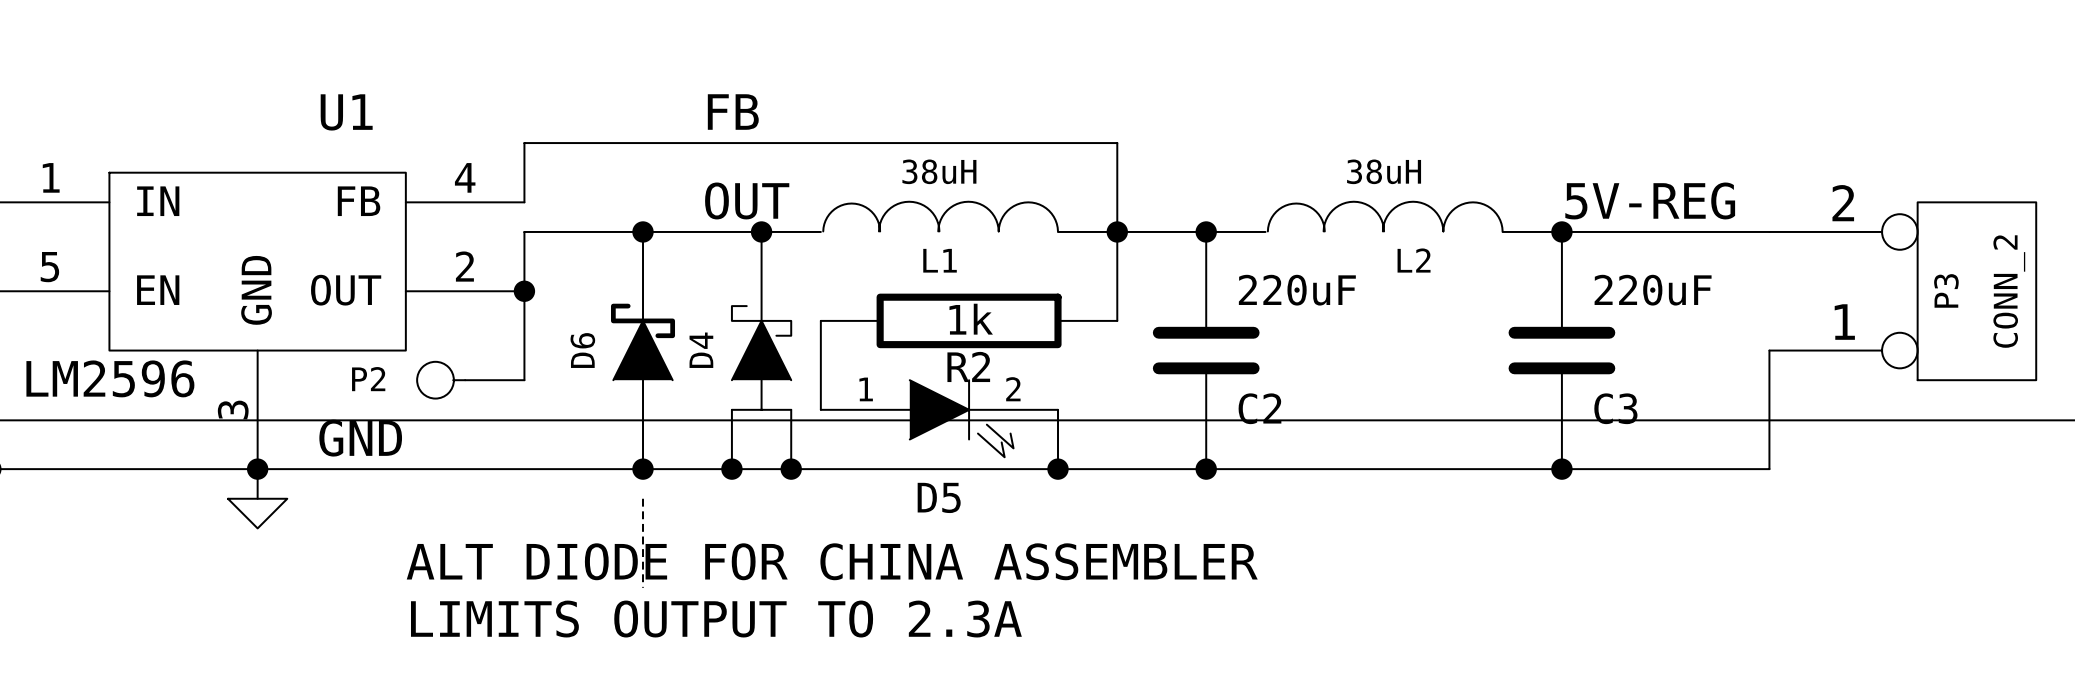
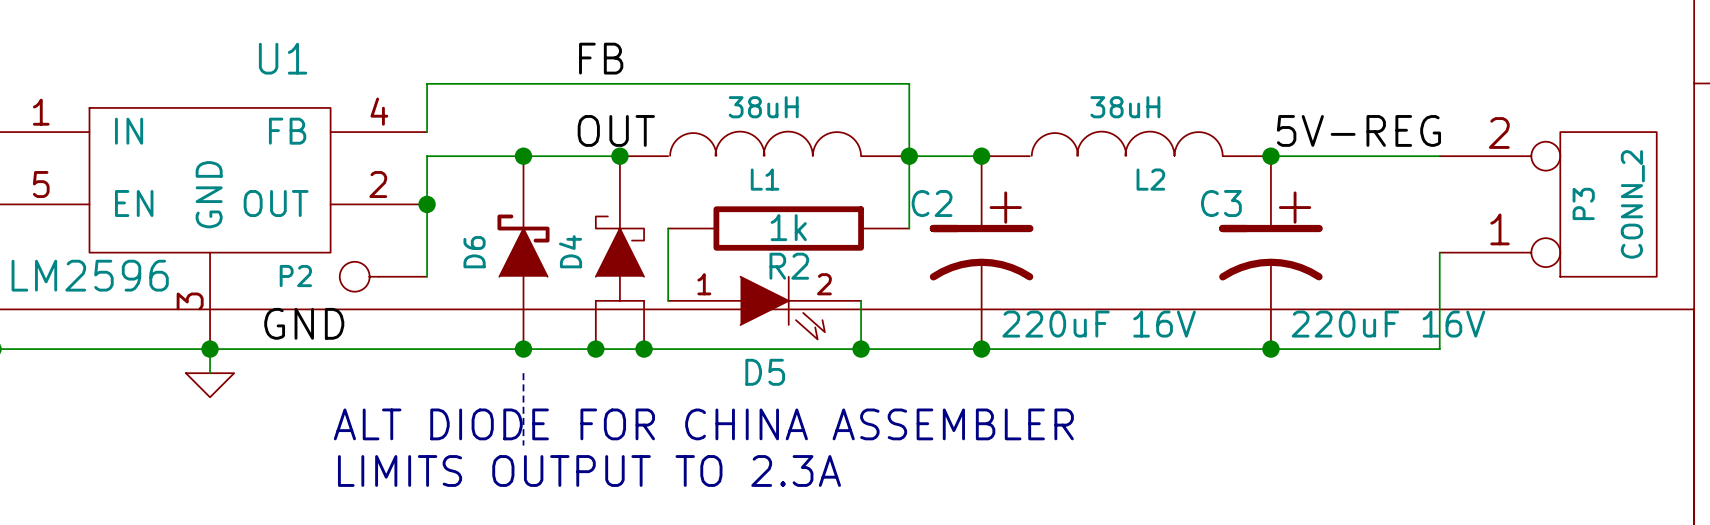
C2 symbol: [1152, 231, 1260, 470] -> [929, 156, 1034, 350]
C3 symbol: [1508, 231, 1616, 470] -> [1219, 156, 1323, 350]
C2 value: 220uF (1297, 290) -> 220uF 16V (1099, 324)
C3 value: 220uF (1653, 290) -> 220uF 16V (1388, 324)
C2 name position: C2 (1259, 408) -> C2 (932, 203)
C3 name position: C3 (1615, 408) -> C3 (1221, 203)

